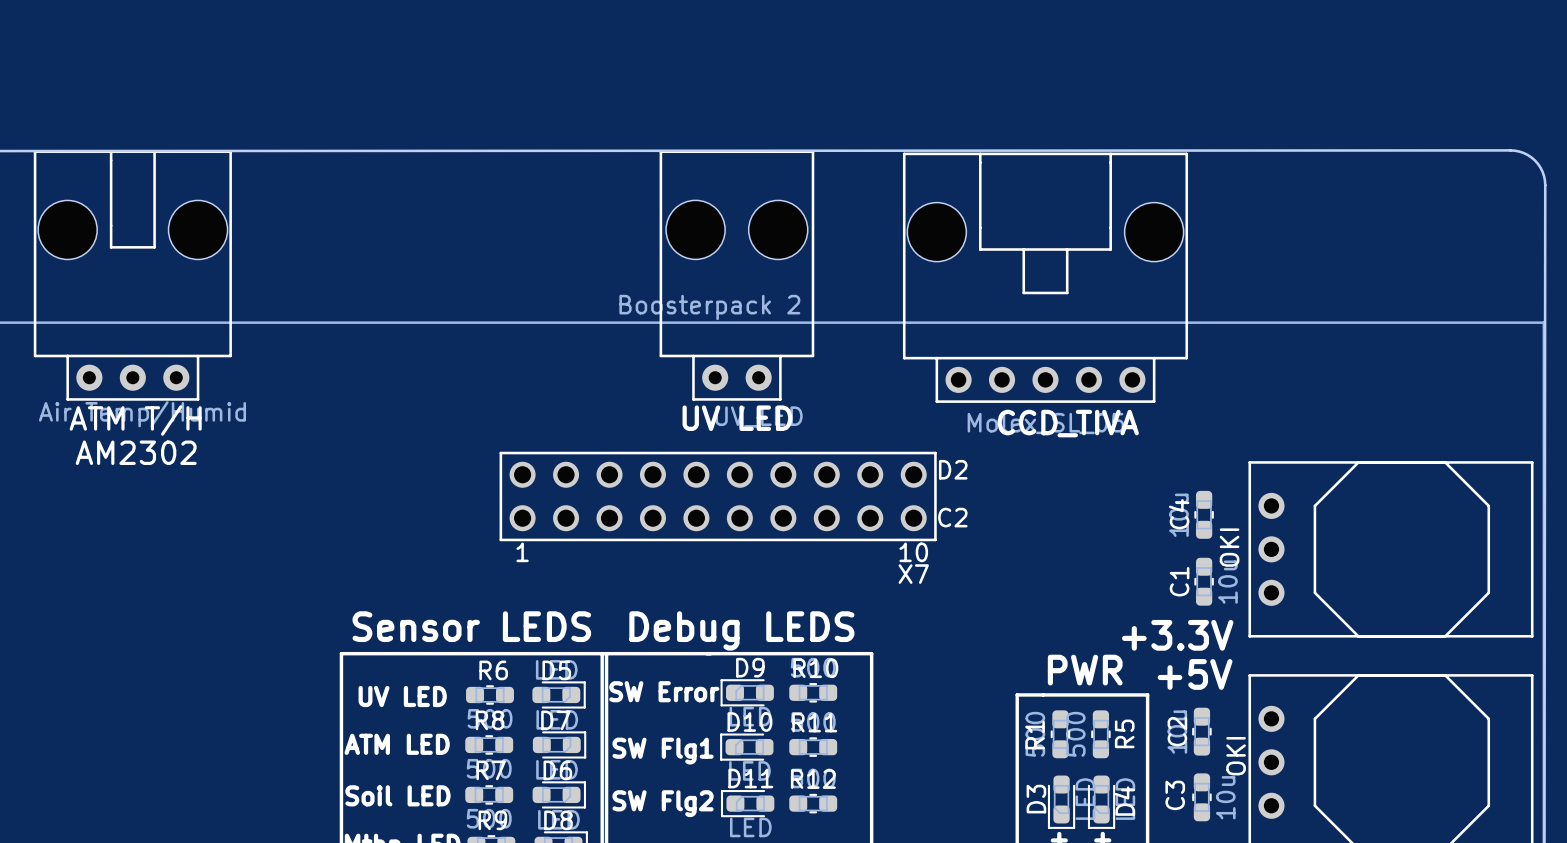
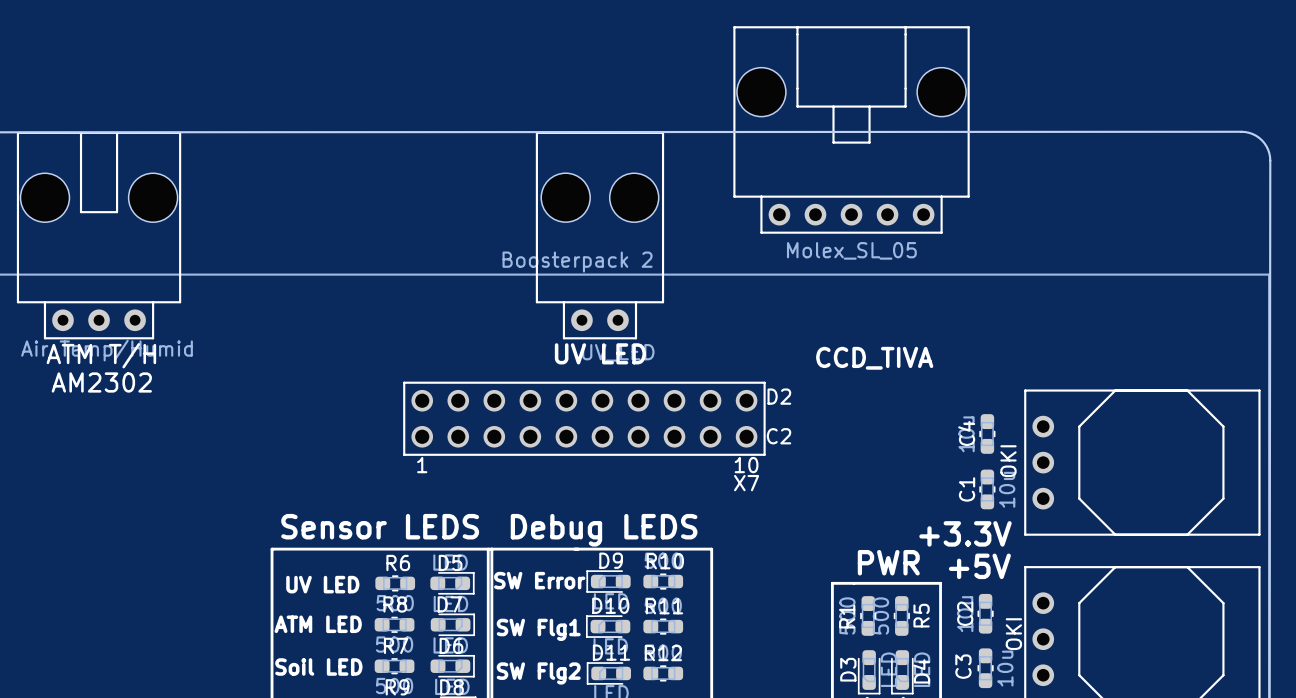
part position: (1045, 277) -> (851, 129)

